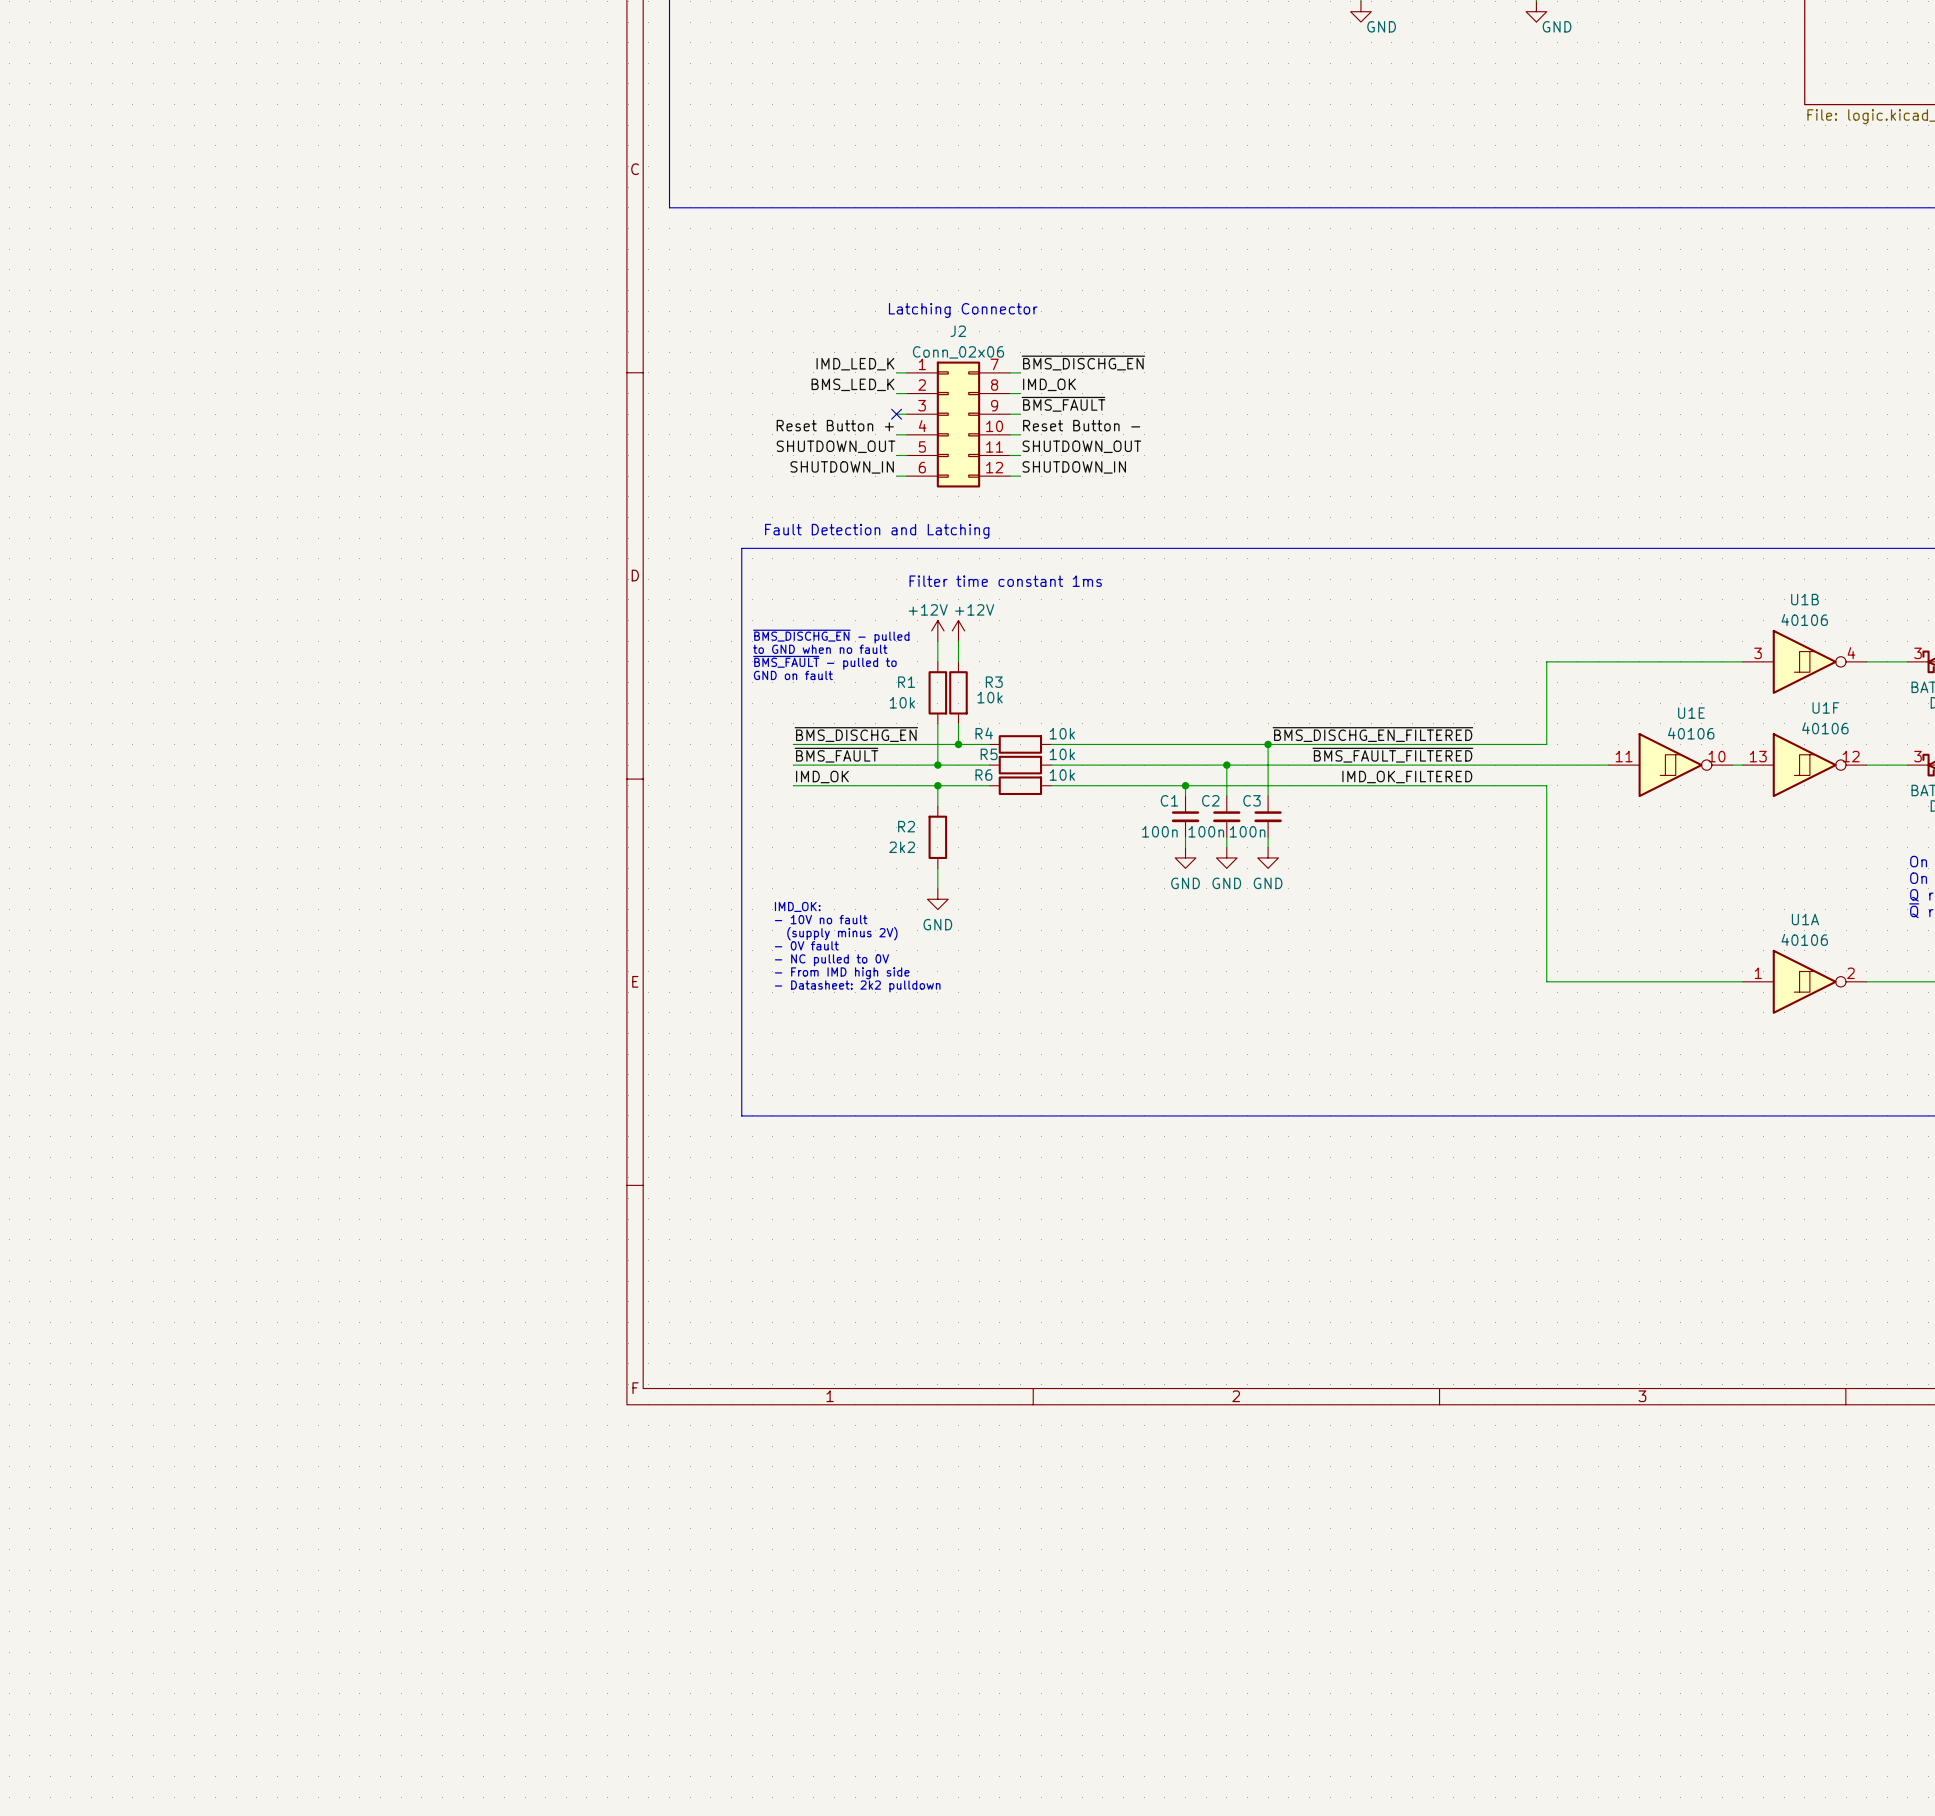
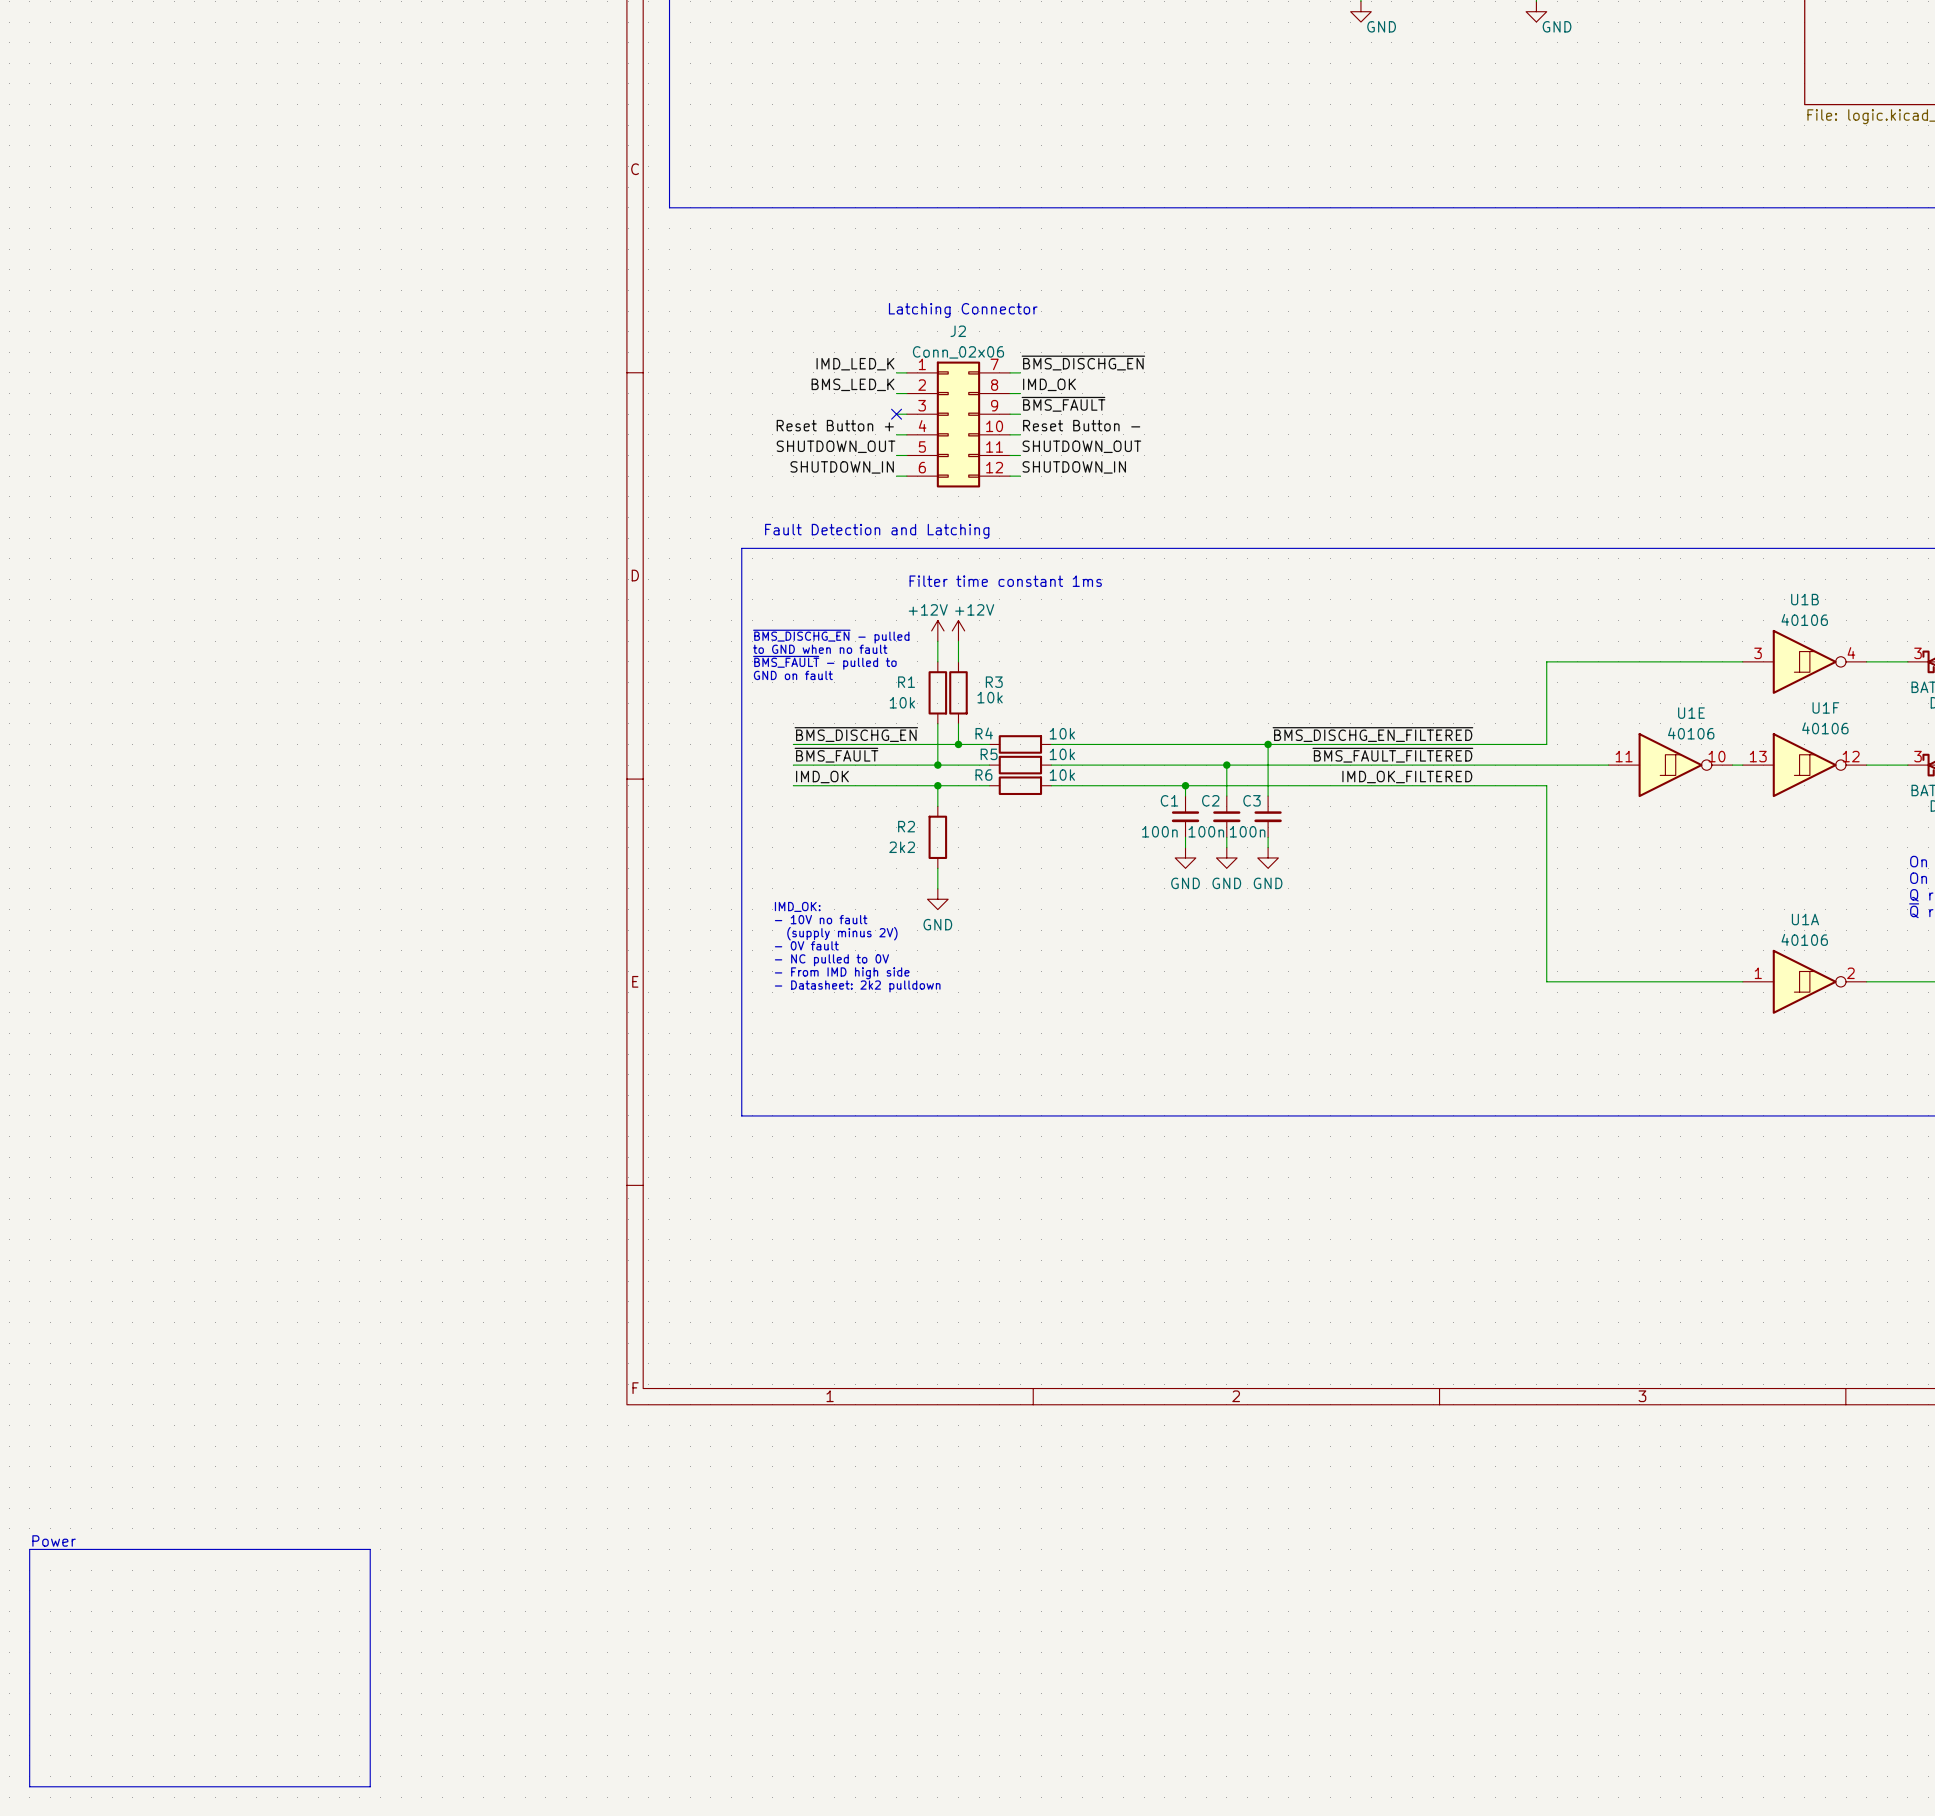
text: none -> Power (54, 1540)
line: none -> (29, 1549) (370, 1549) (370, 1786) (29, 1786) (29, 1549)

